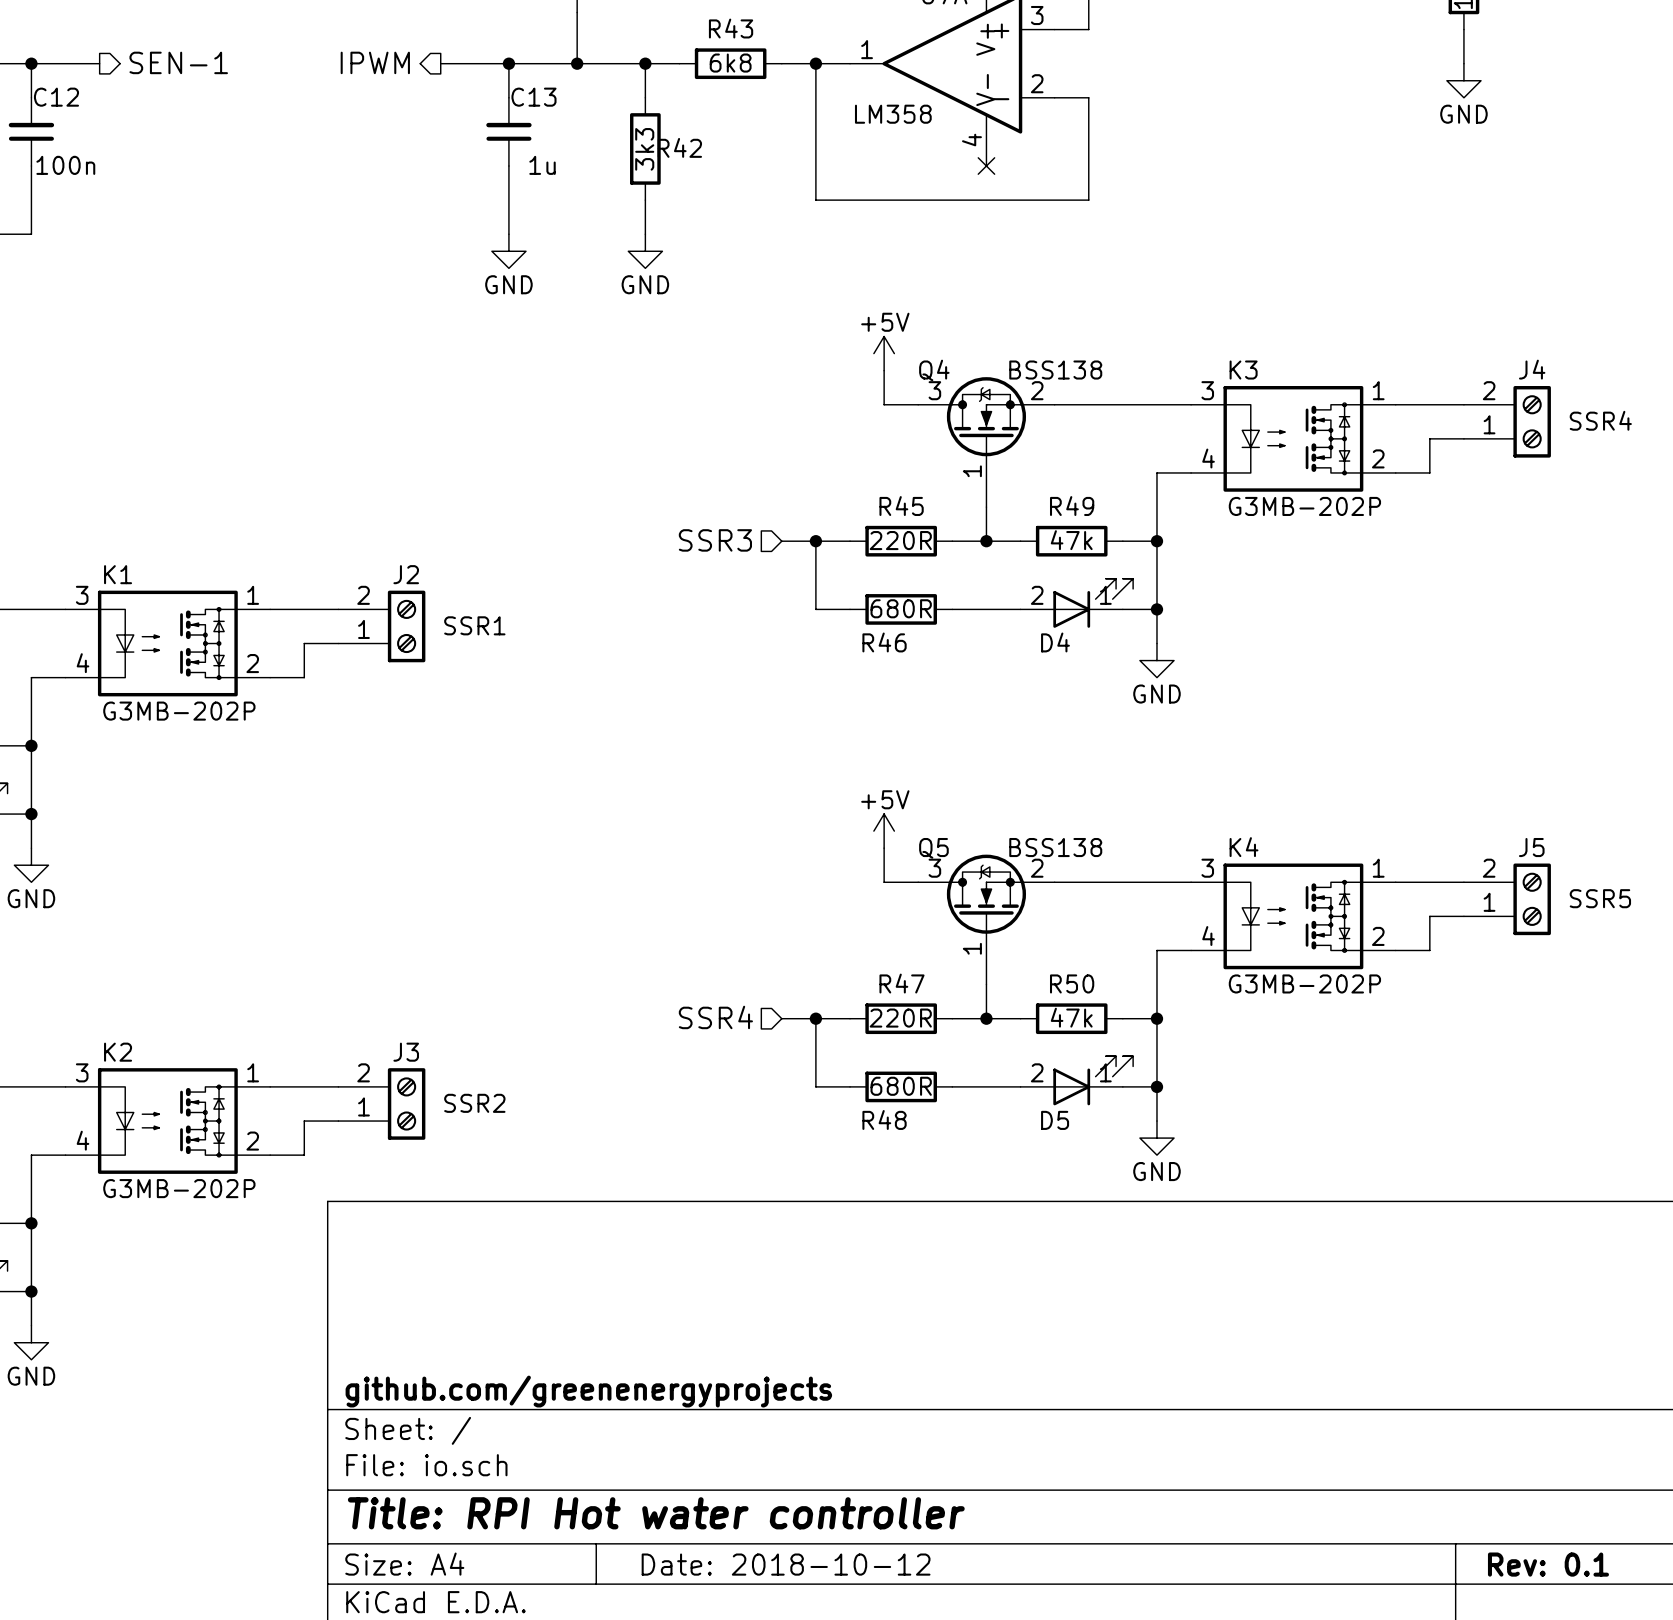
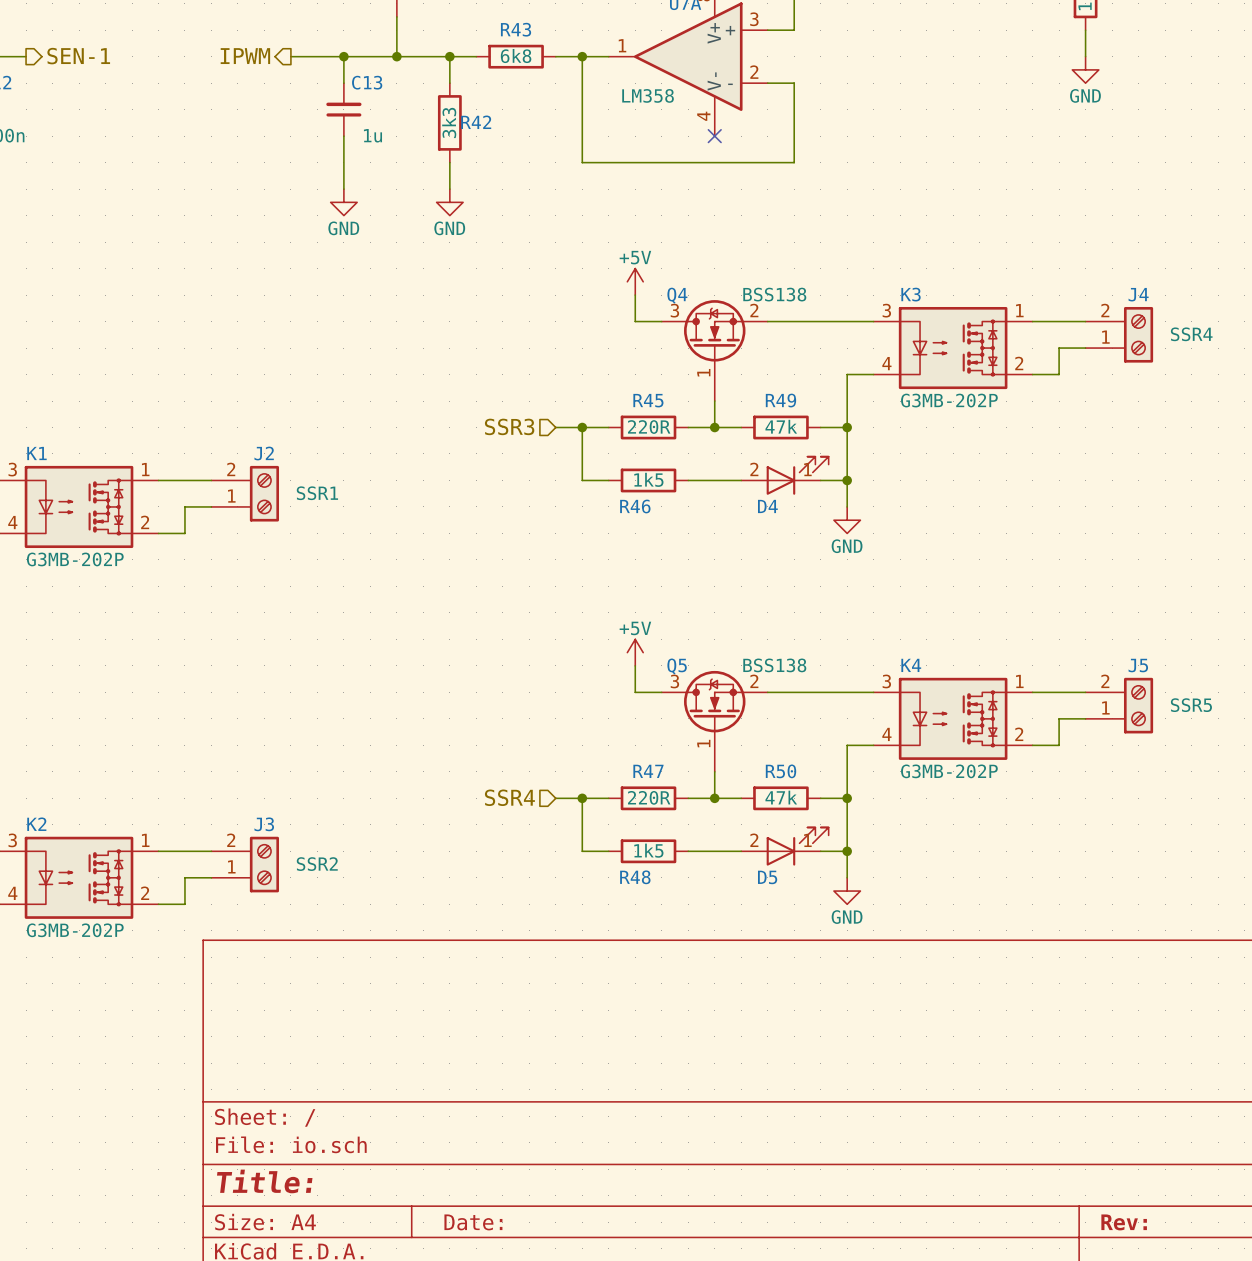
R46 value: 680R (901, 608) -> 1k5 (648, 479)
R48 value: 680R (901, 1086) -> 1k5 (648, 850)
title block: github.com/greenenergyprojects (588, 1391) -> none
title block: Title: RPI Hot water controller (656, 1513) -> Title: (264, 1181)
title block: Date: 2018-10-12 (786, 1564) -> Date: (473, 1222)
title block: Rev: 0.1 (1548, 1564) -> Rev: (1124, 1222)

